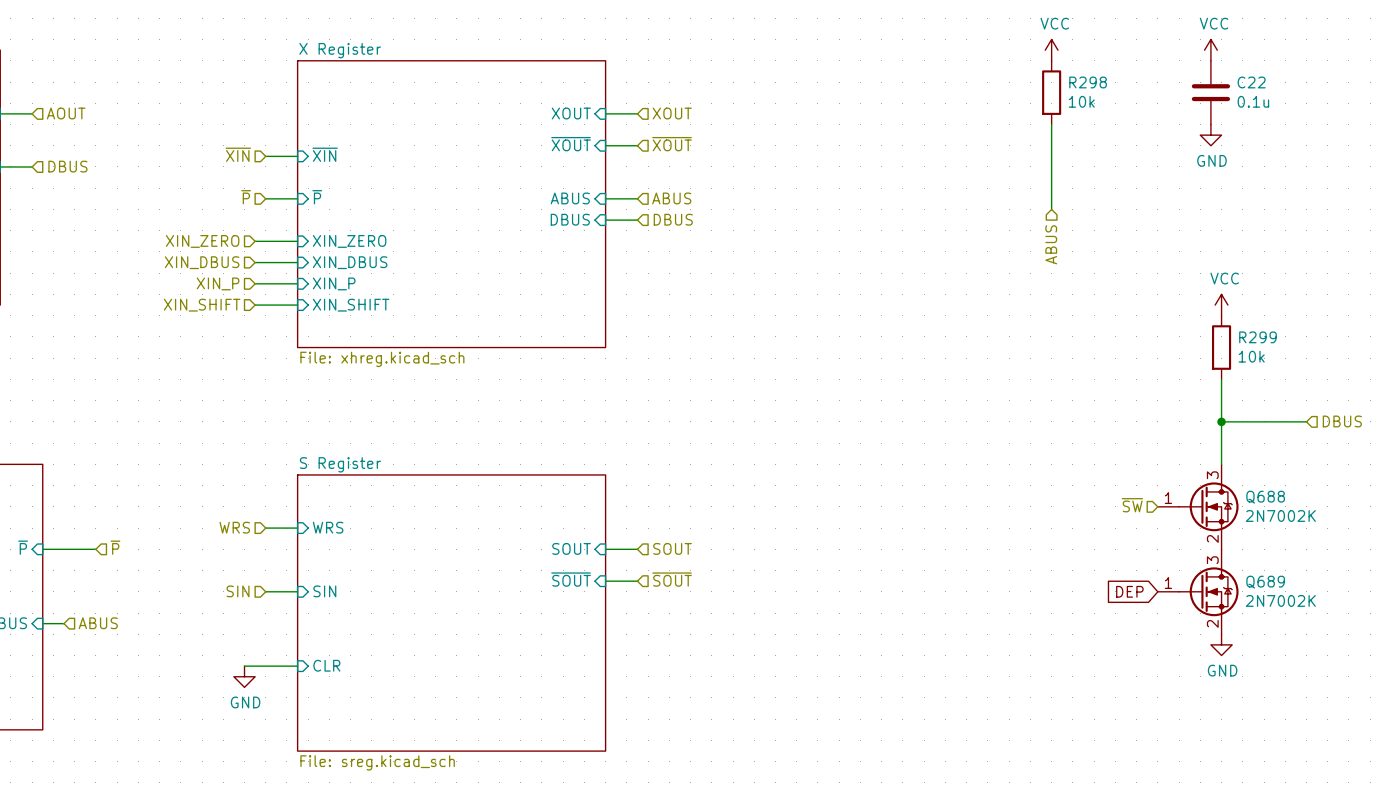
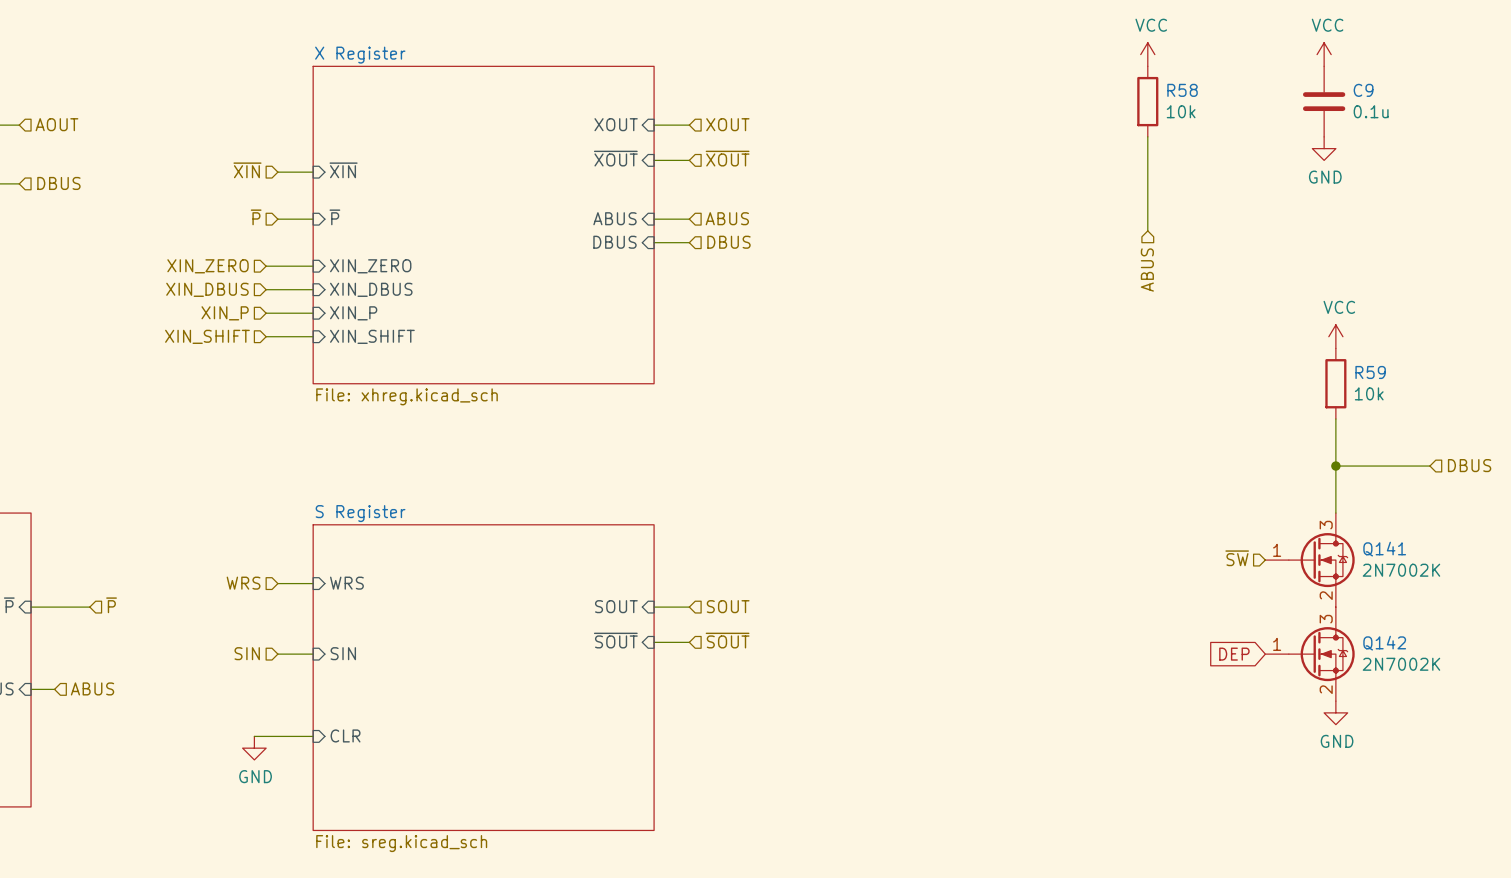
R298 name: R298 (1088, 82) -> R58 (1182, 90)
C22 name: C22 (1251, 82) -> C9 (1363, 90)
R299 name: R299 (1257, 337) -> R59 (1370, 372)
Q688 name: Q688 (1265, 497) -> Q141 (1384, 549)
Q689 name: Q689 (1265, 582) -> Q142 (1384, 643)

